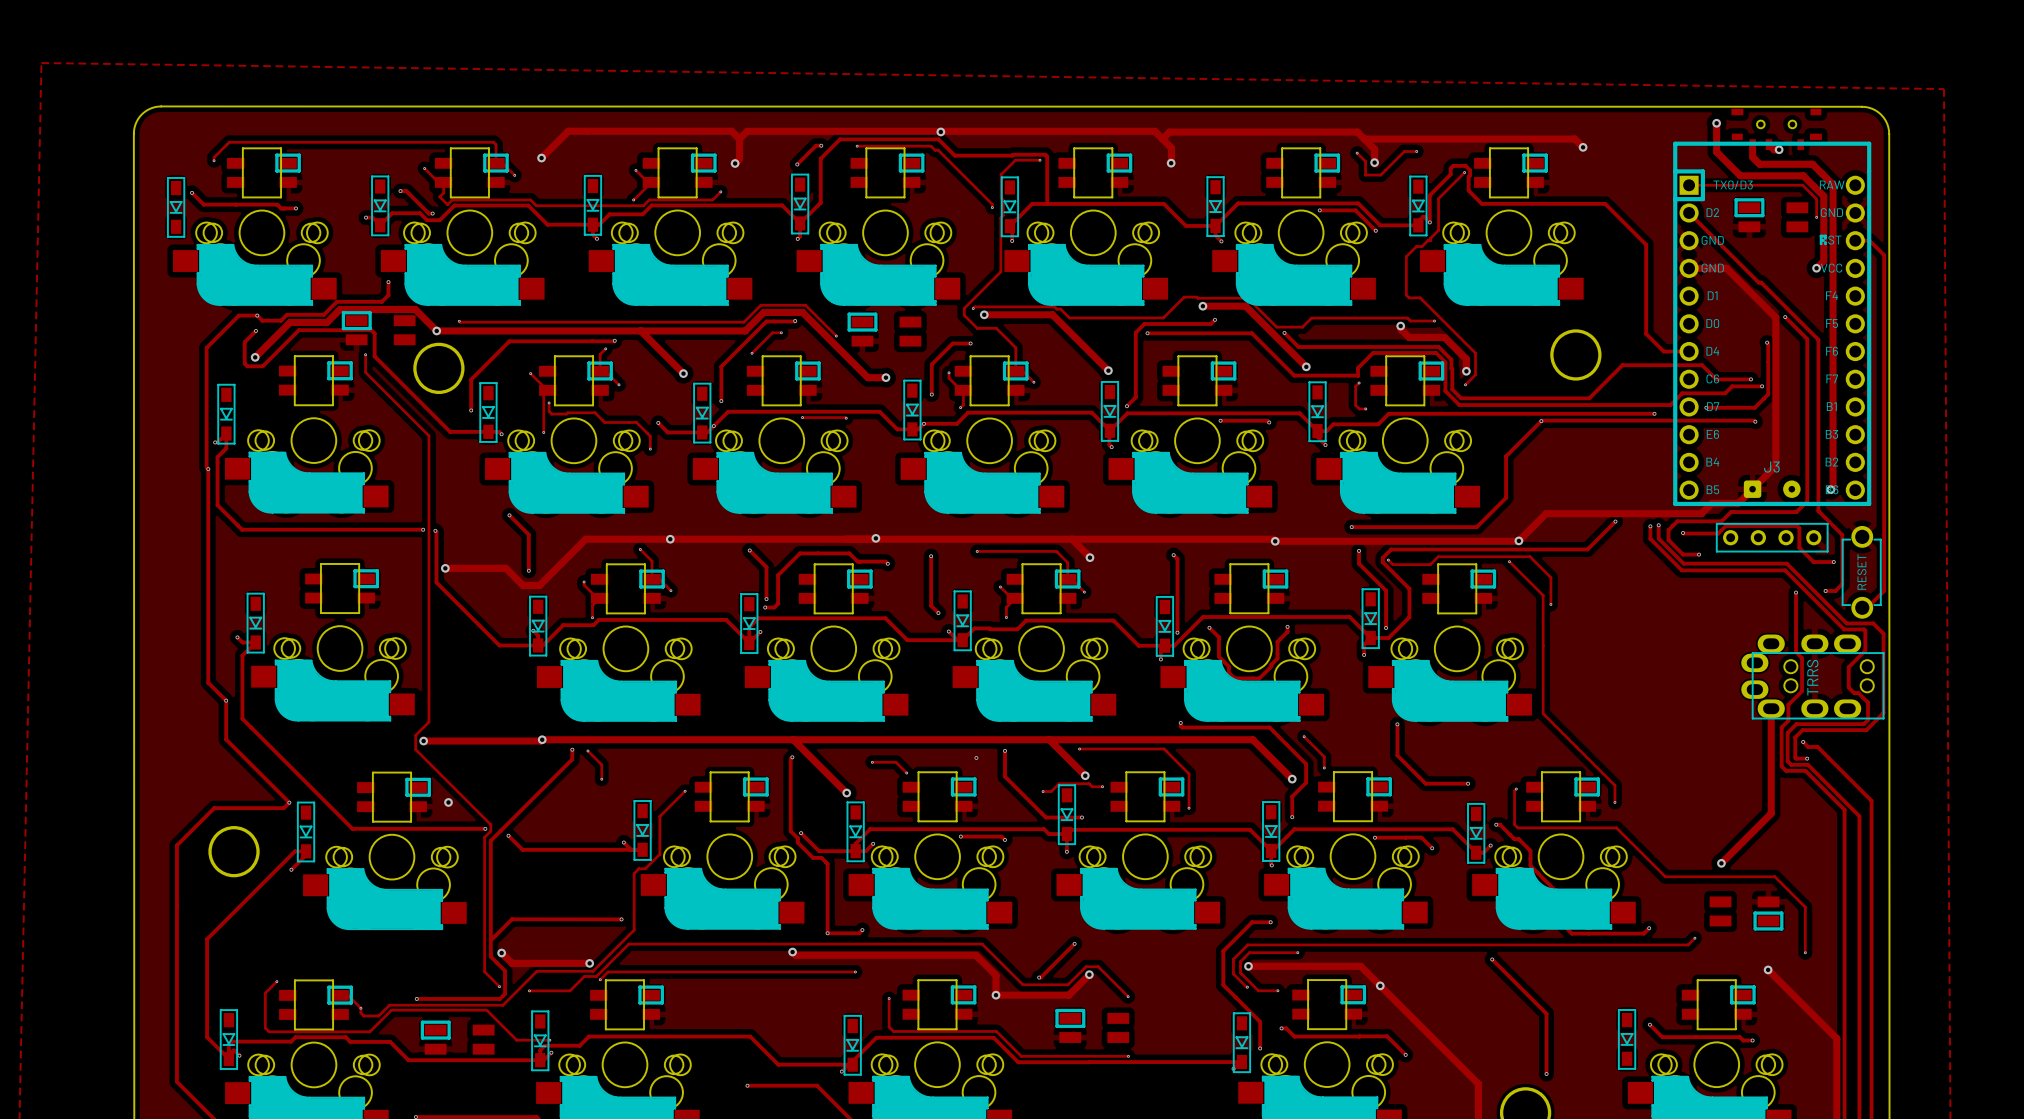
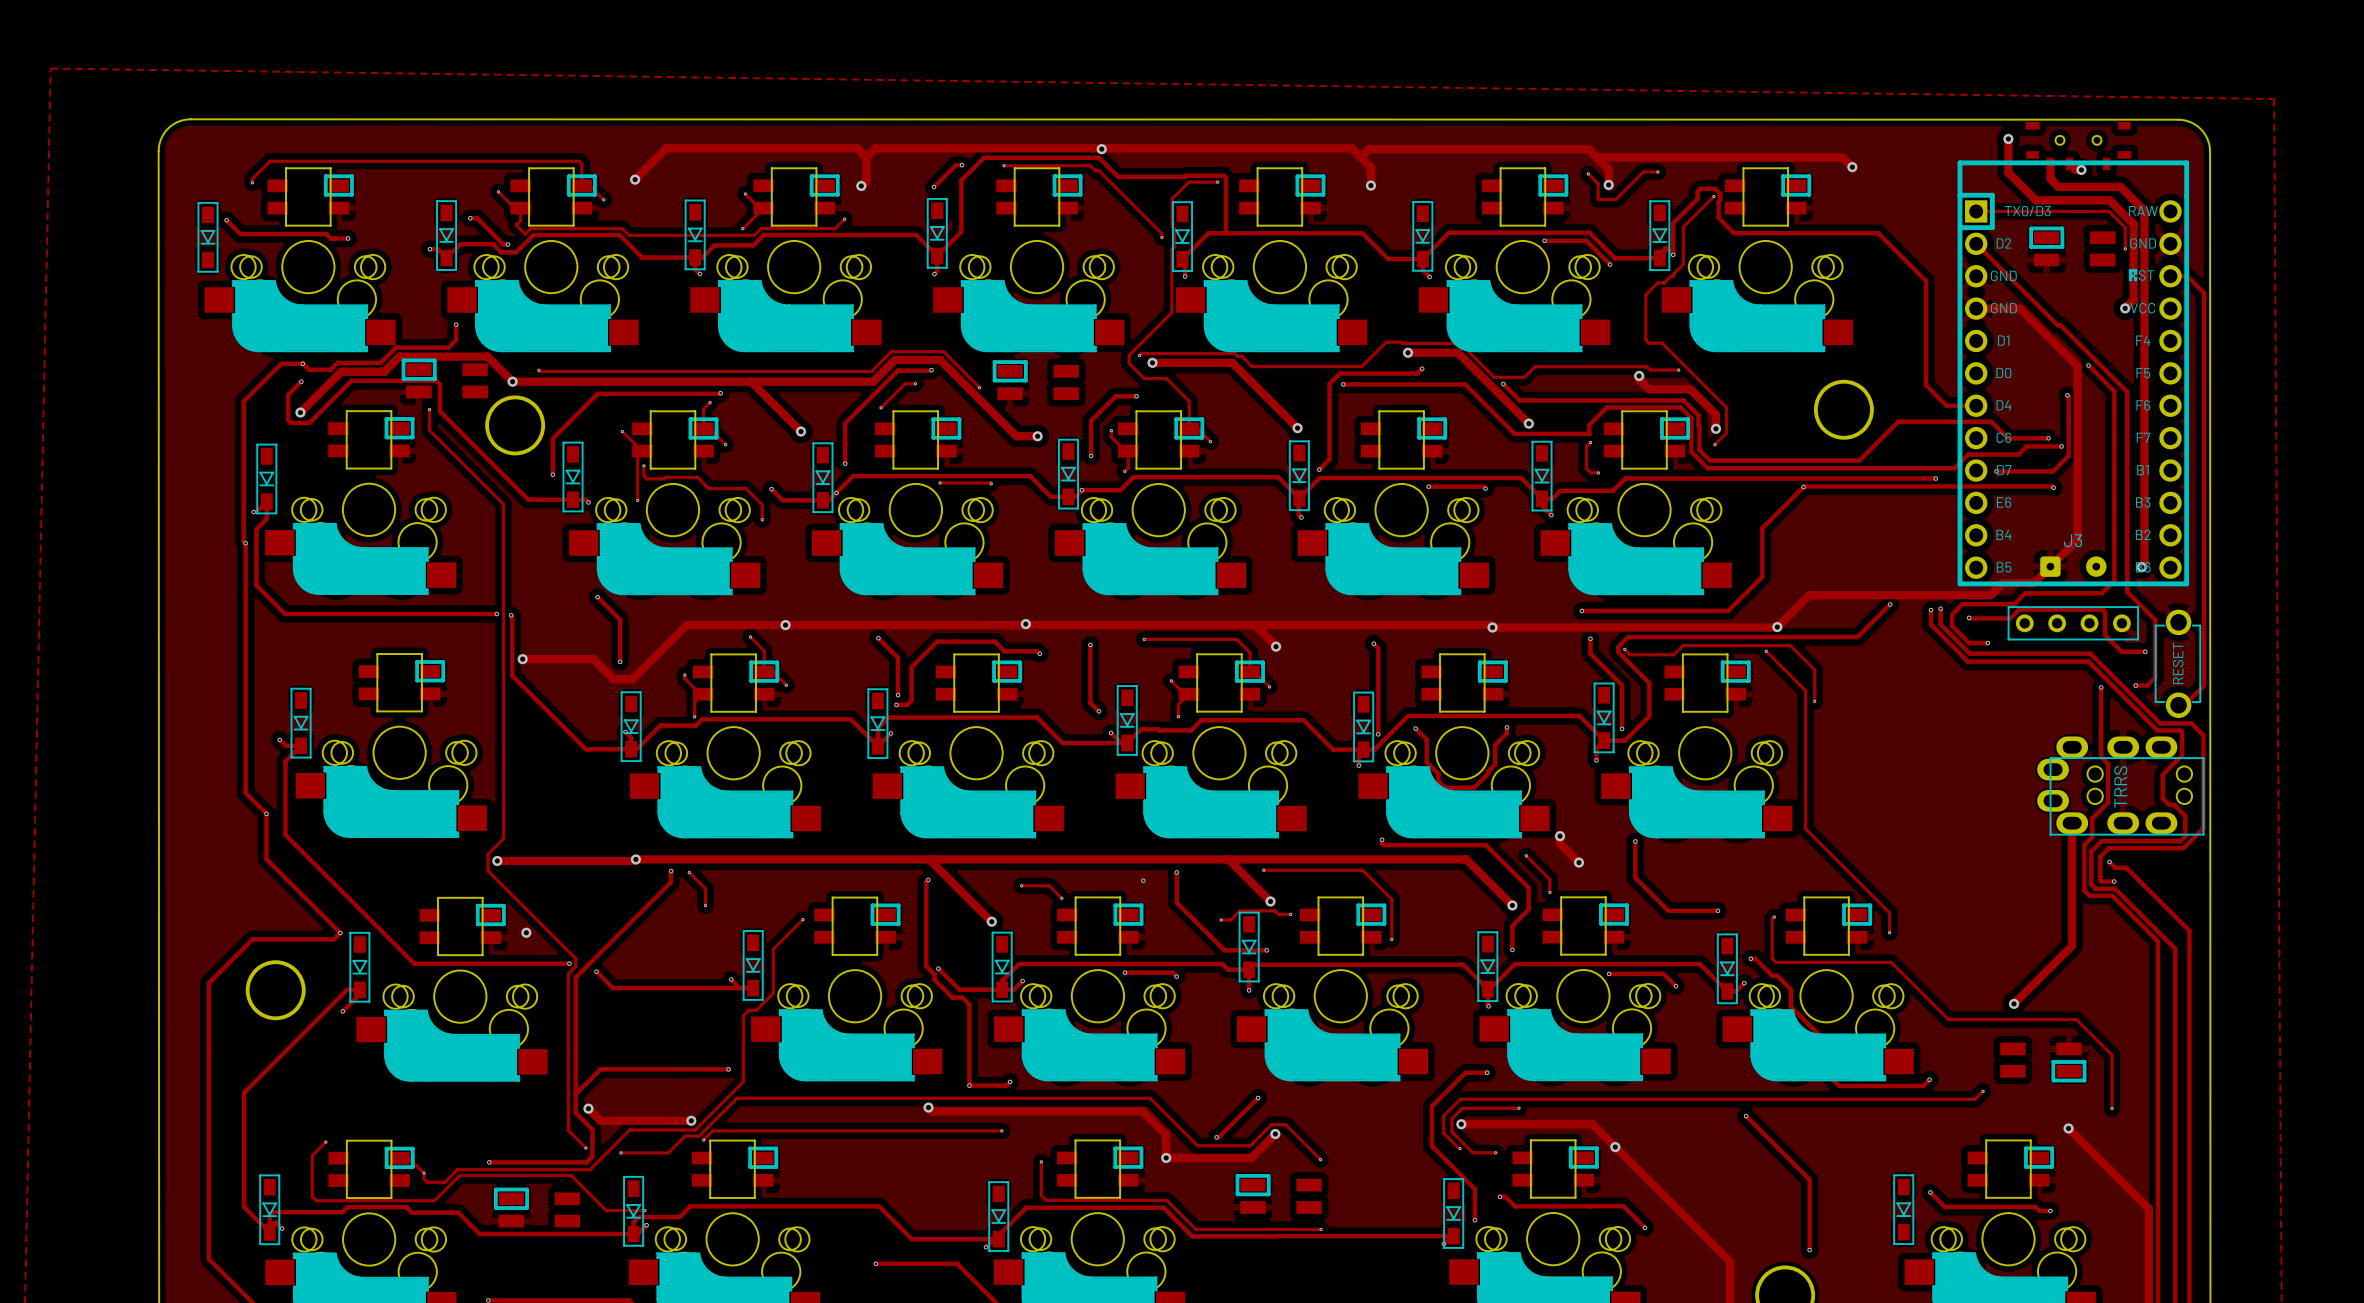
track: none -> (1560, 836) (1560, 843) (1578, 862)
via: none -> (1560, 836)
via: none -> (1578, 862)

